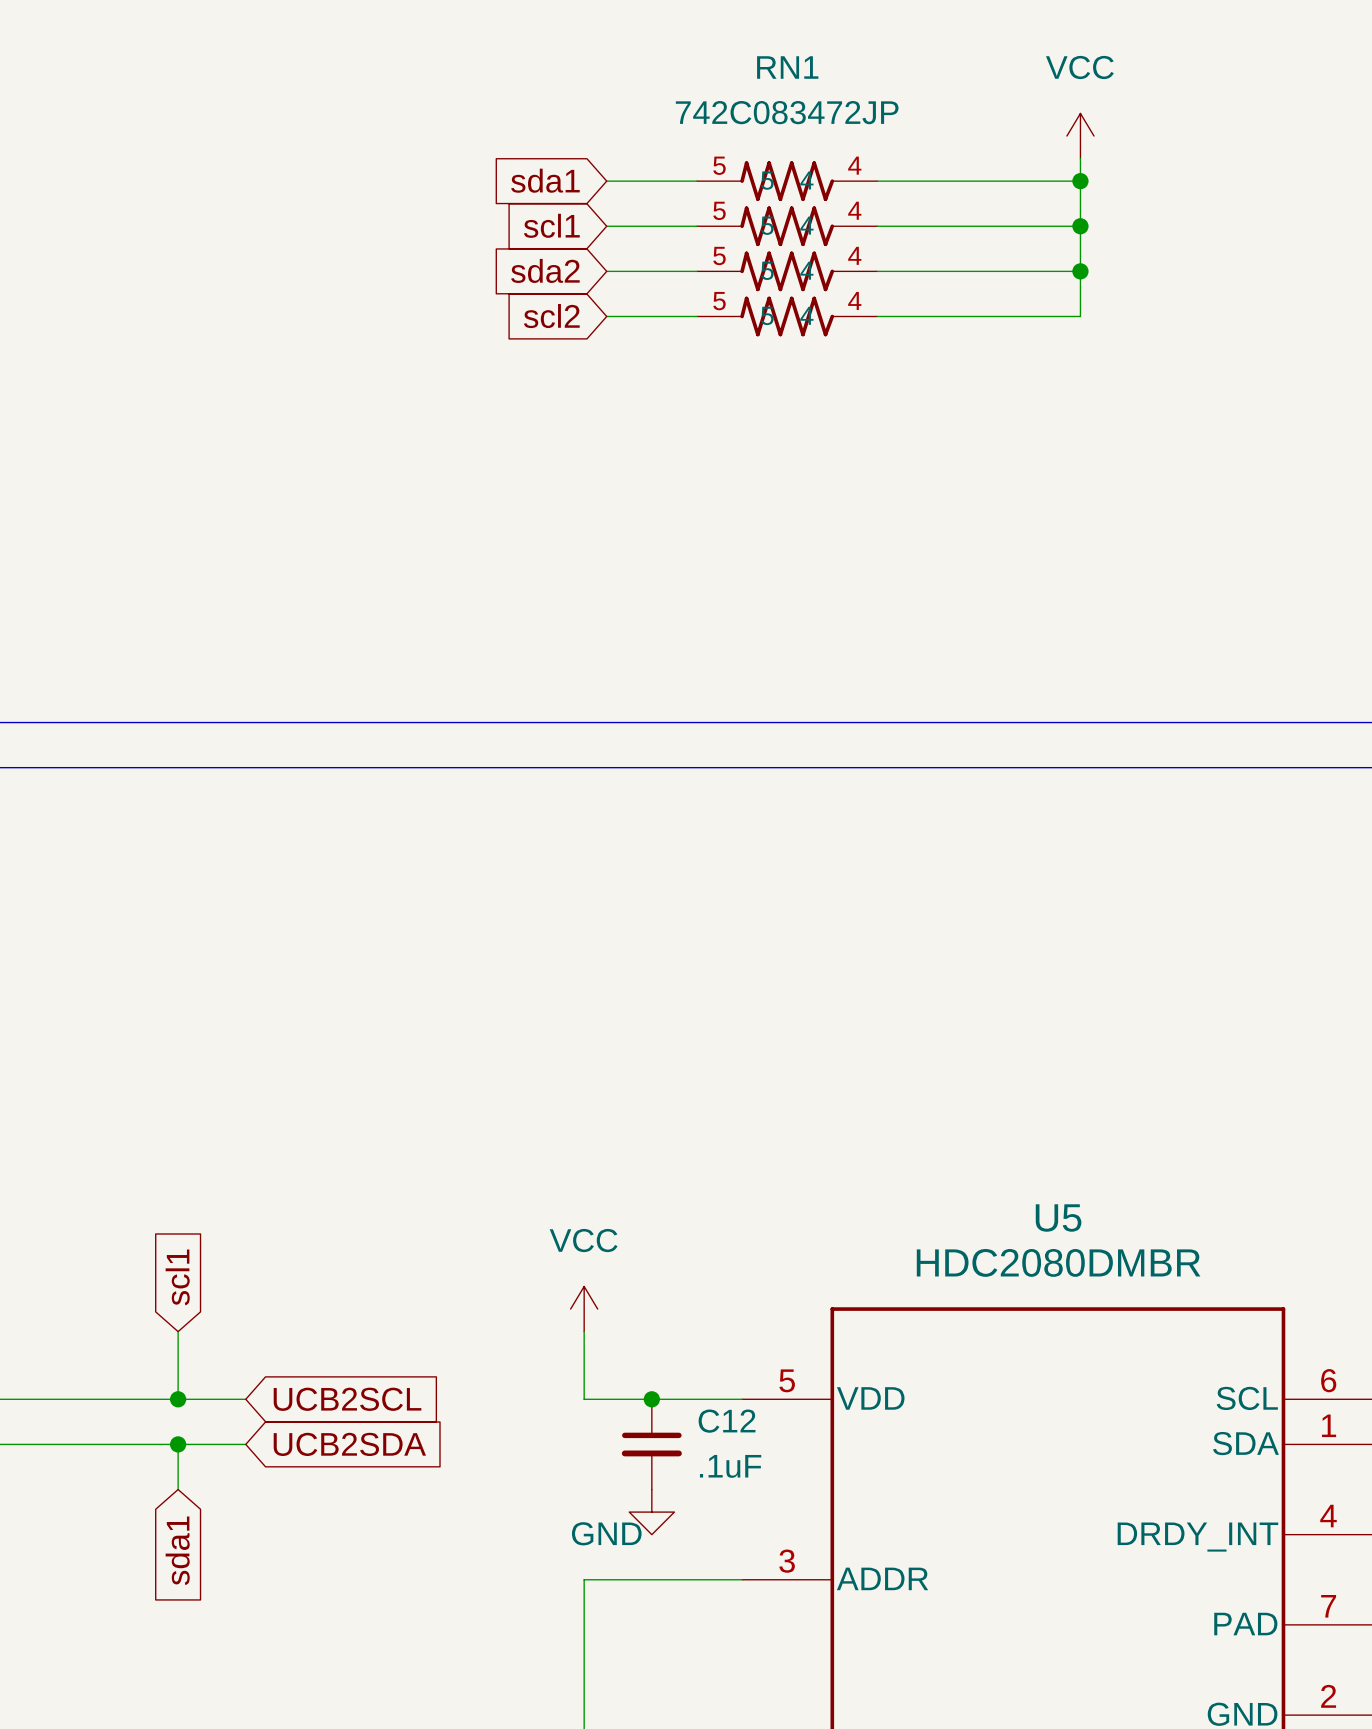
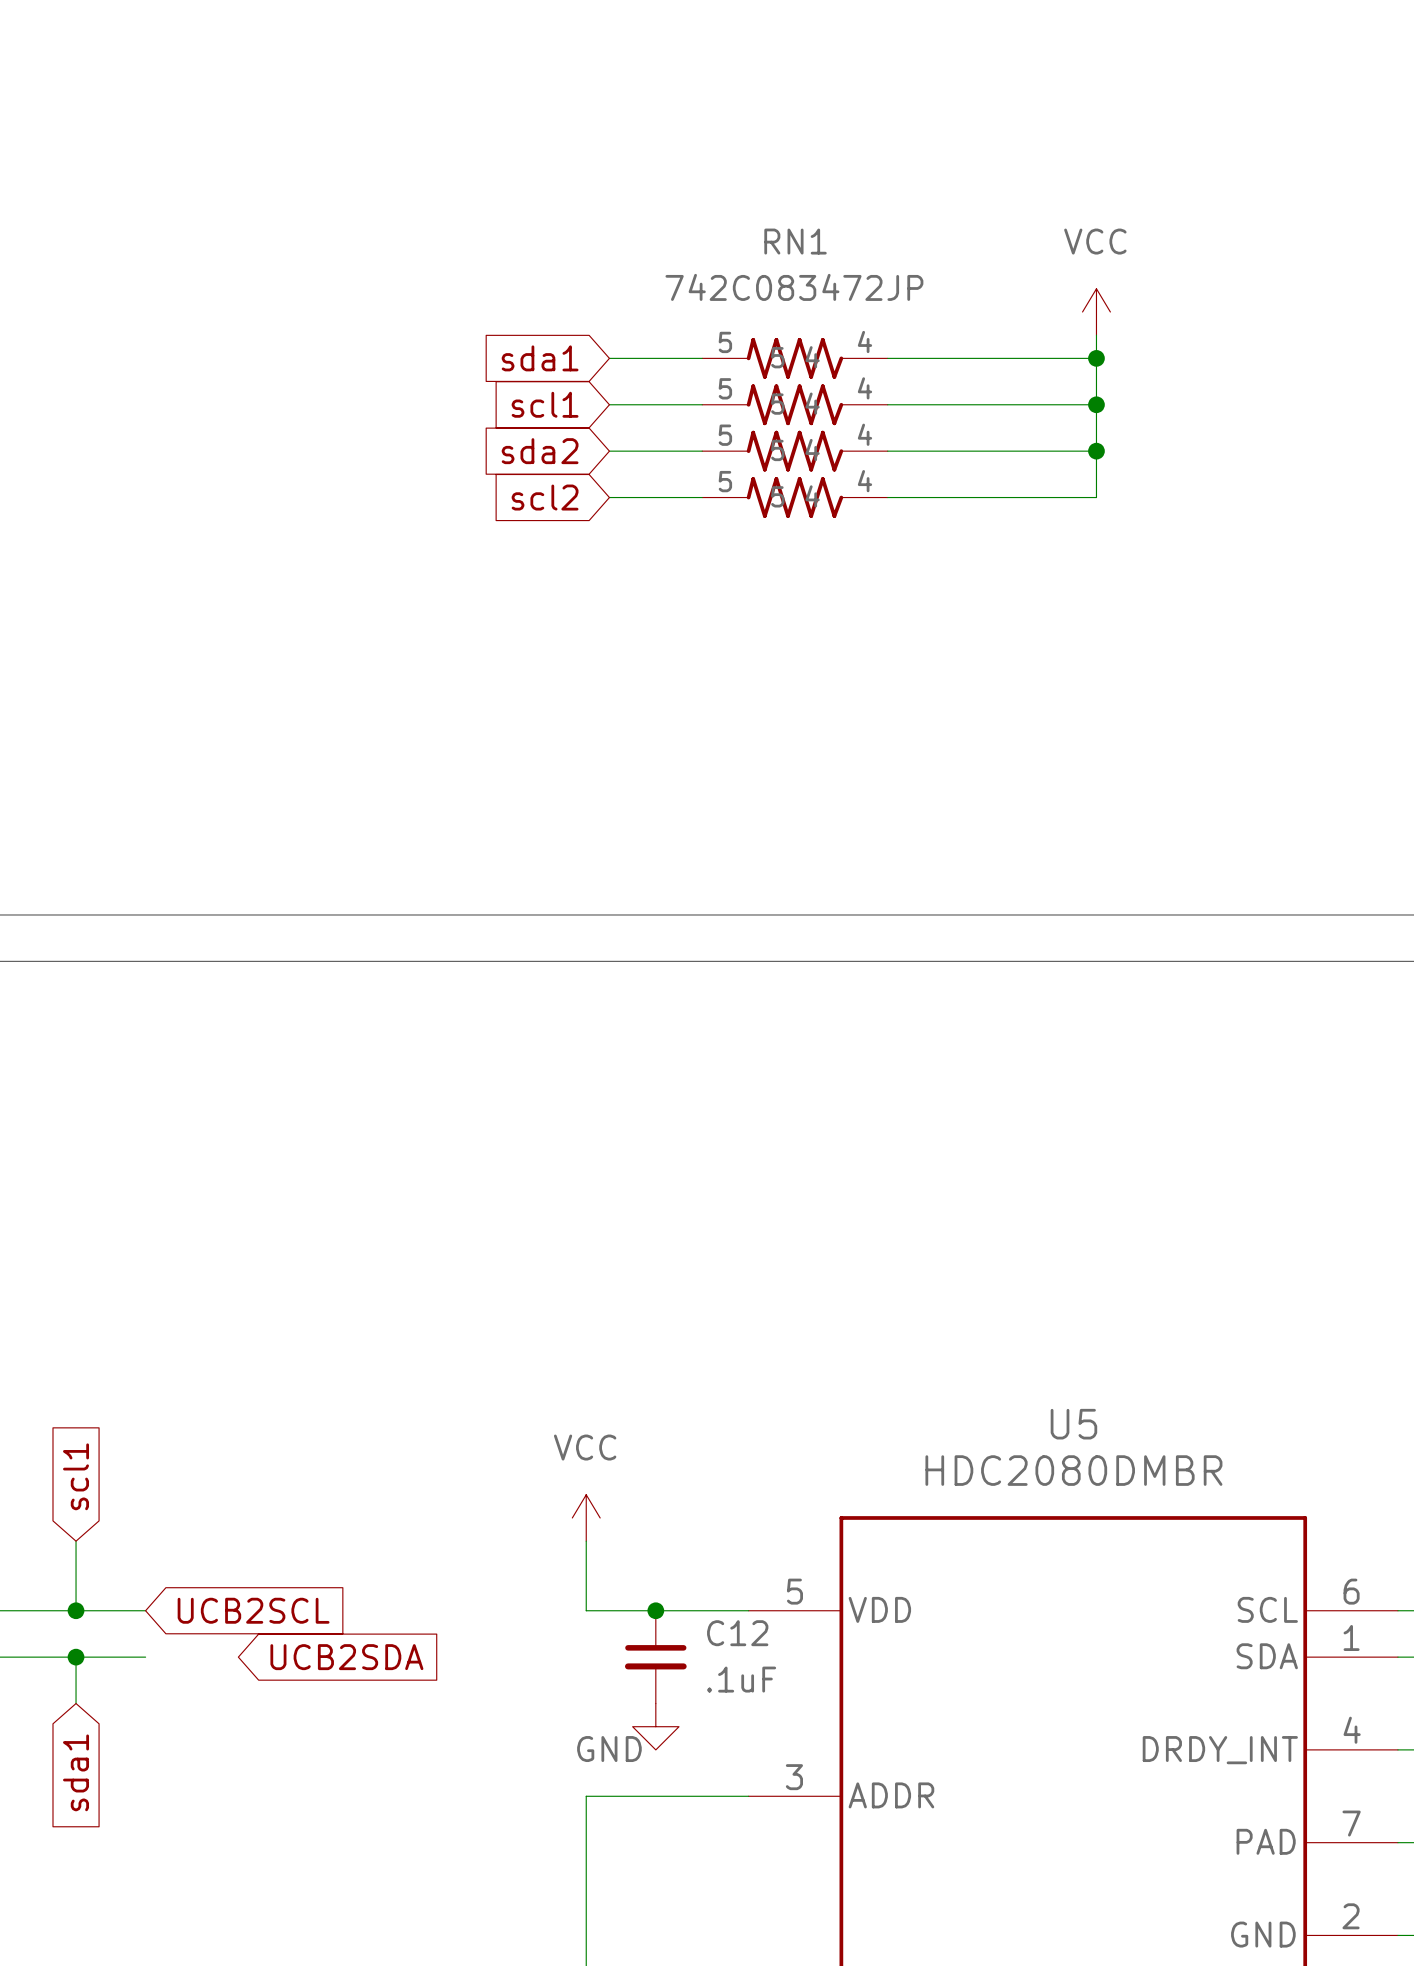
global label position: scl1 (177, 1277) -> scl1 (76, 1476)
wire: (178, 1331) (178, 1399) -> (76, 1541) (76, 1610)
junction: none -> (76, 1610)
wire: (155, 1399) (245, 1399) -> none
junction: (178, 1399) -> none
global label position: UCB2SCL (347, 1399) -> UCB2SCL (253, 1610)
junction: none -> (76, 1657)
wire: (155, 1444) (245, 1444) -> none
wire: (178, 1444) (178, 1489) -> (76, 1657) (76, 1703)
junction: (178, 1444) -> none
global label position: sda1 (177, 1550) -> sda1 (76, 1772)

